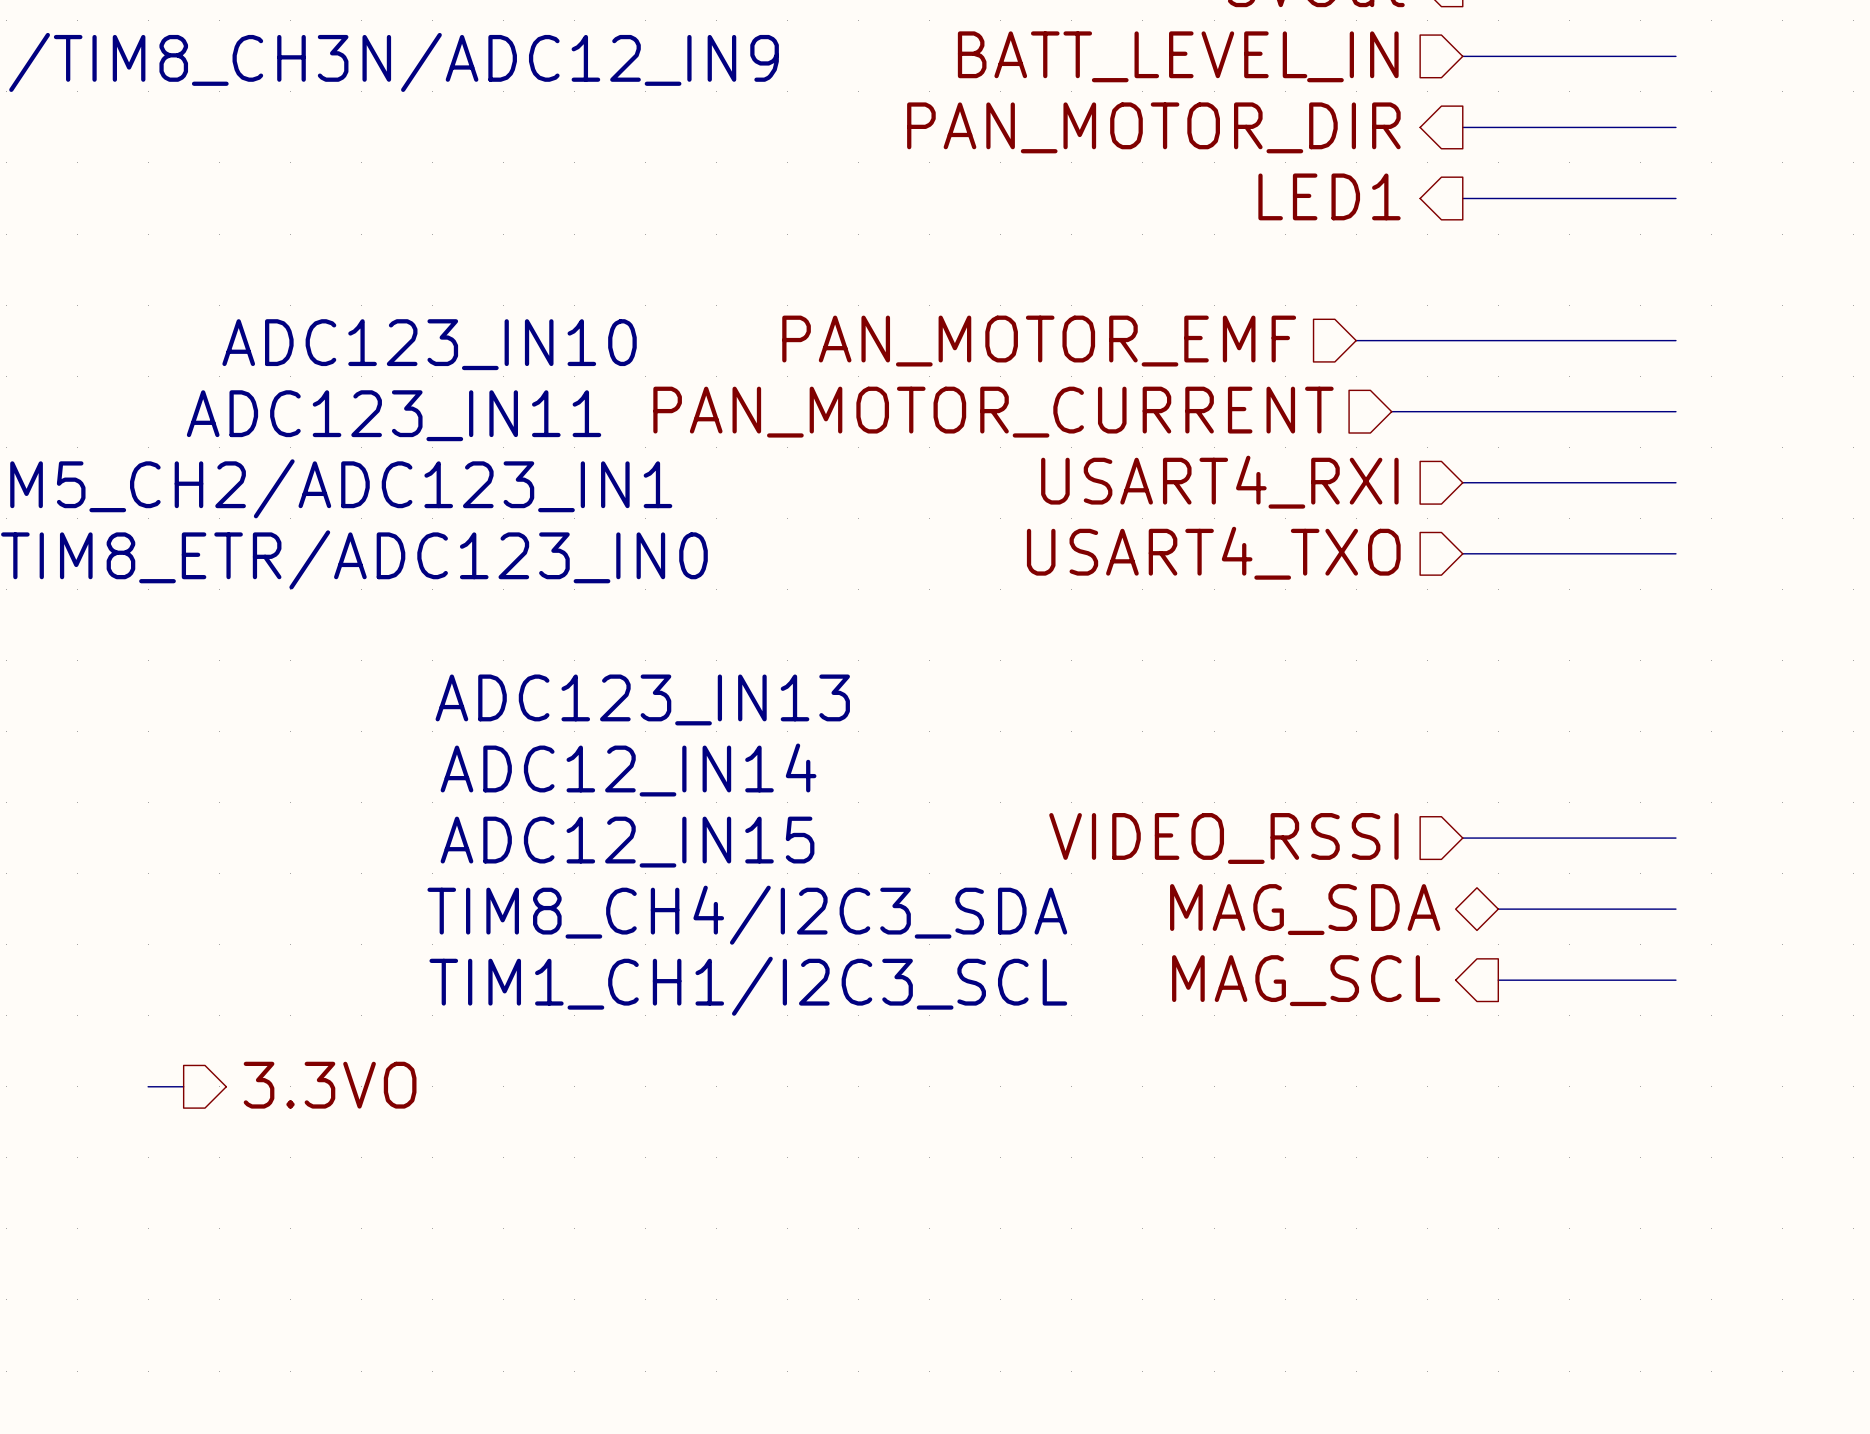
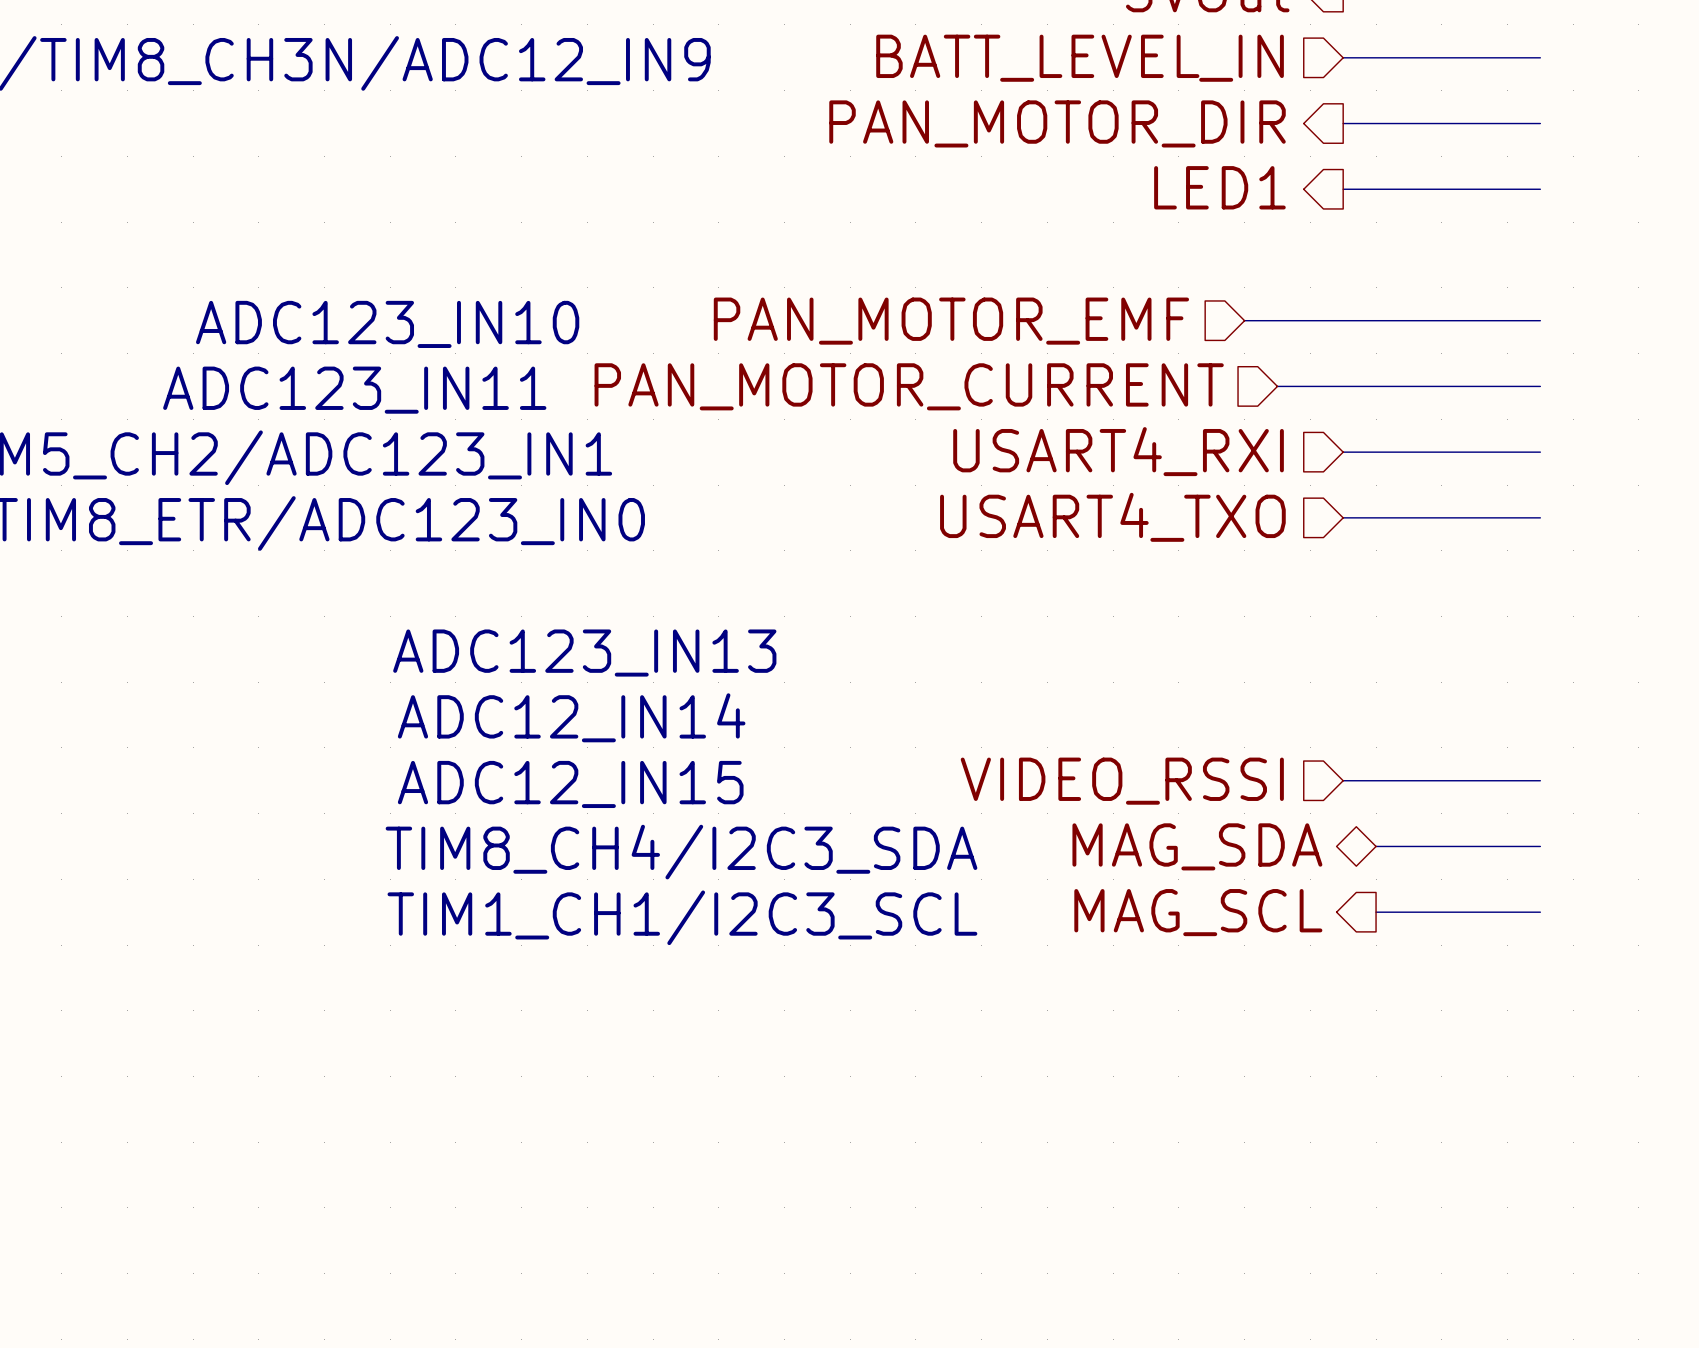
hierarchical label: 3.3VO (330, 1085) -> none
wire: (148, 1086) (183, 1086) -> none

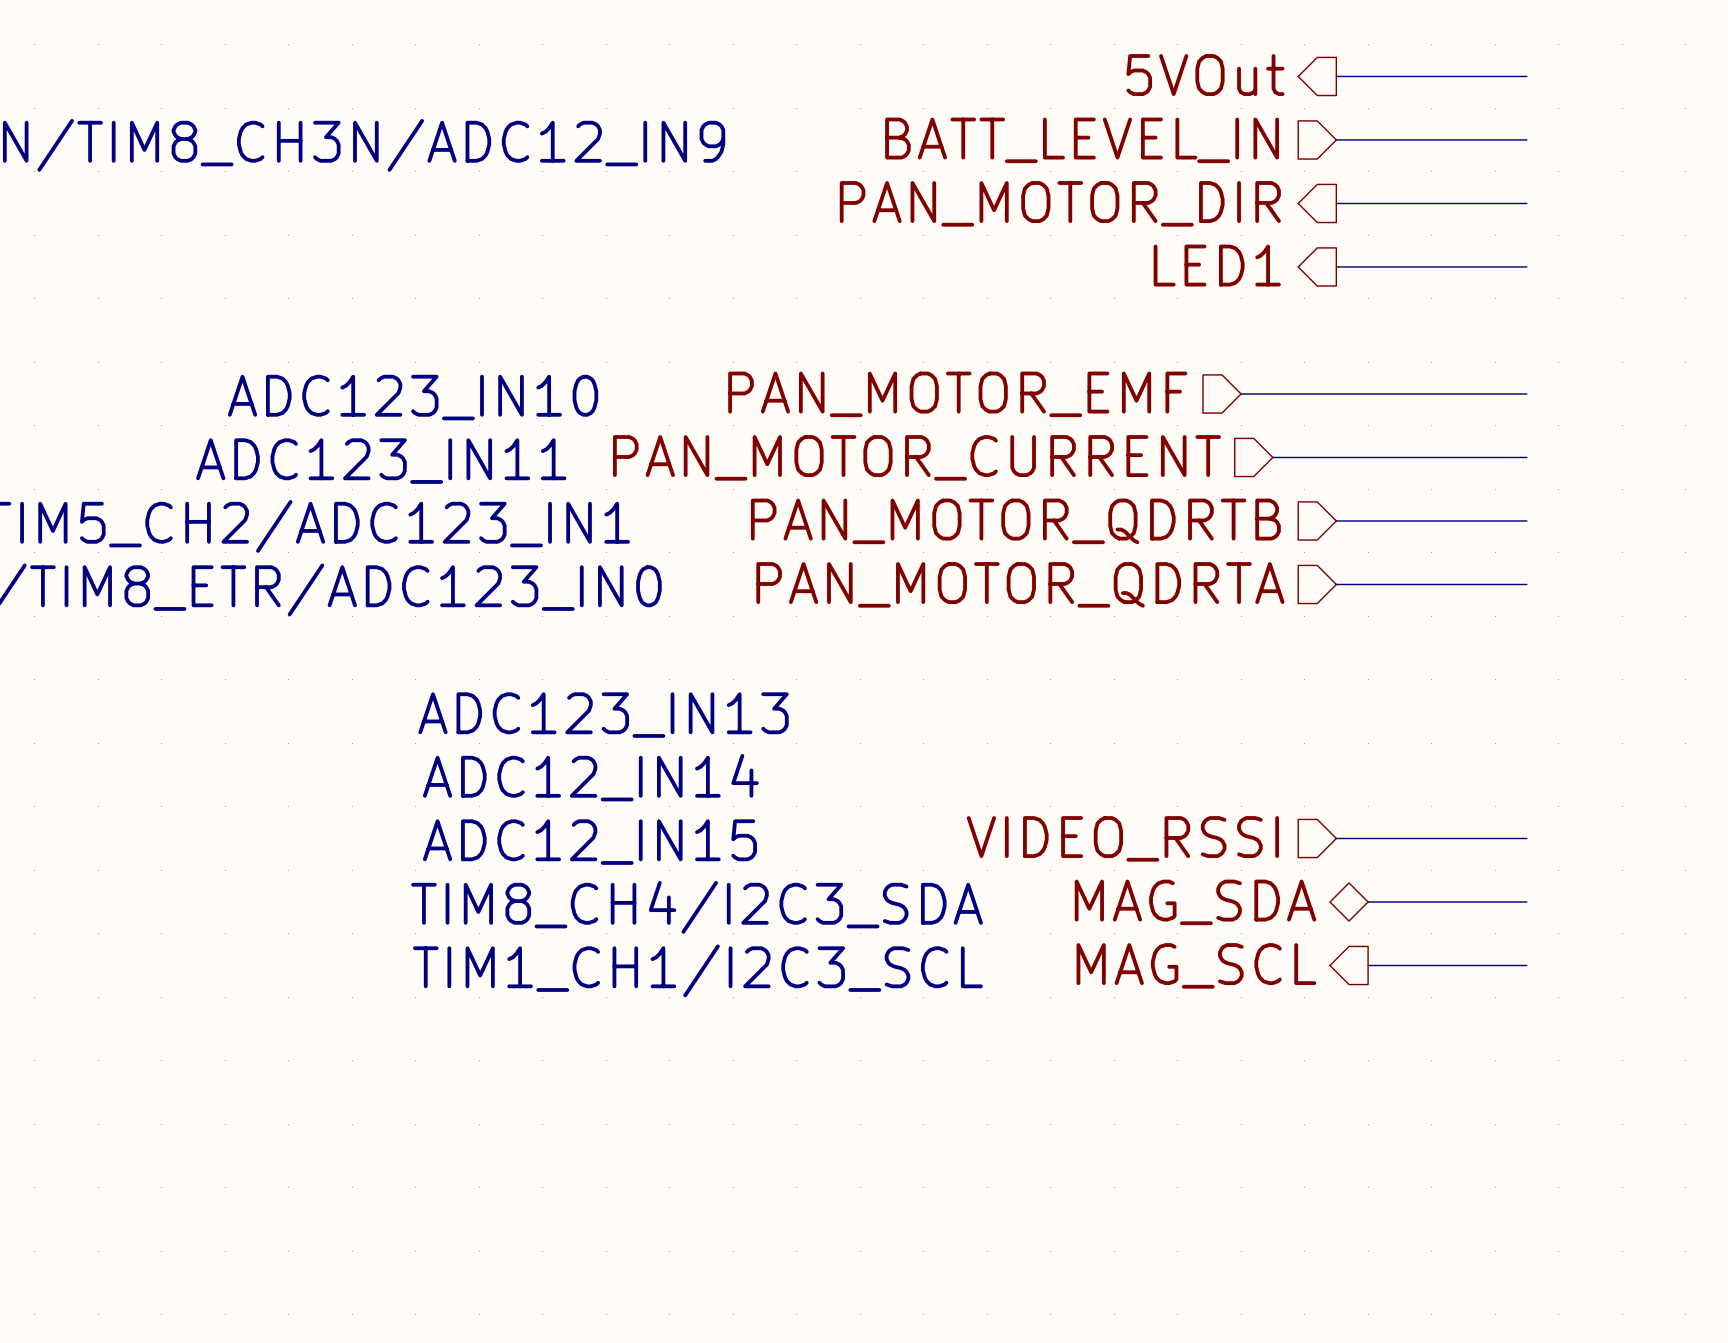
hierarchical label: USART4_RXI (1118, 451) -> PAN_MOTOR_QDRTB (1015, 521)
hierarchical label: USART4_TXO (1112, 517) -> PAN_MOTOR_QDRTA (1020, 584)

